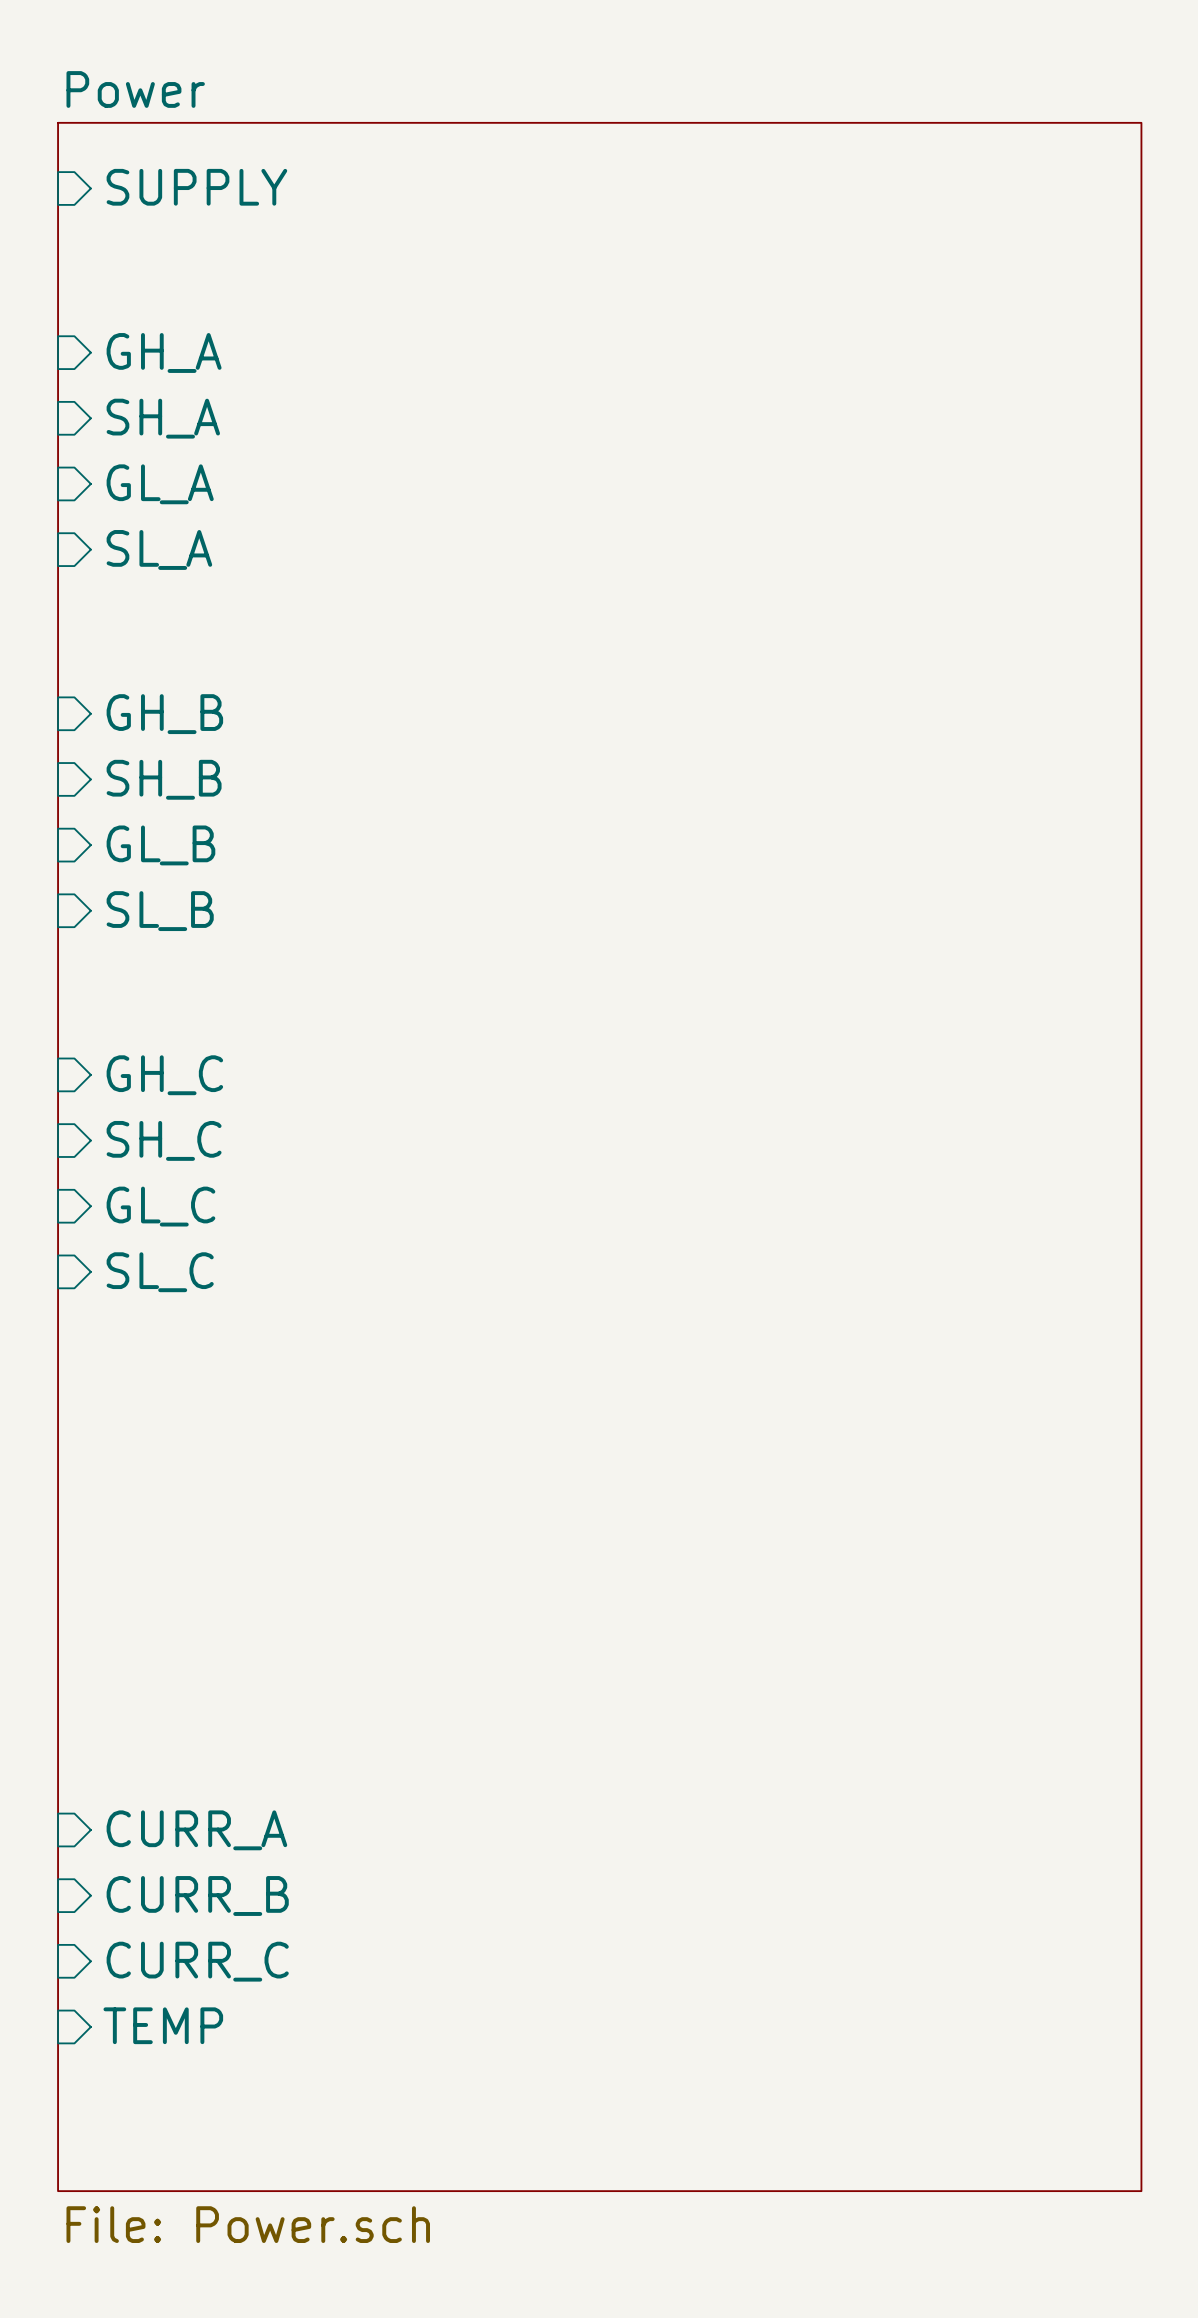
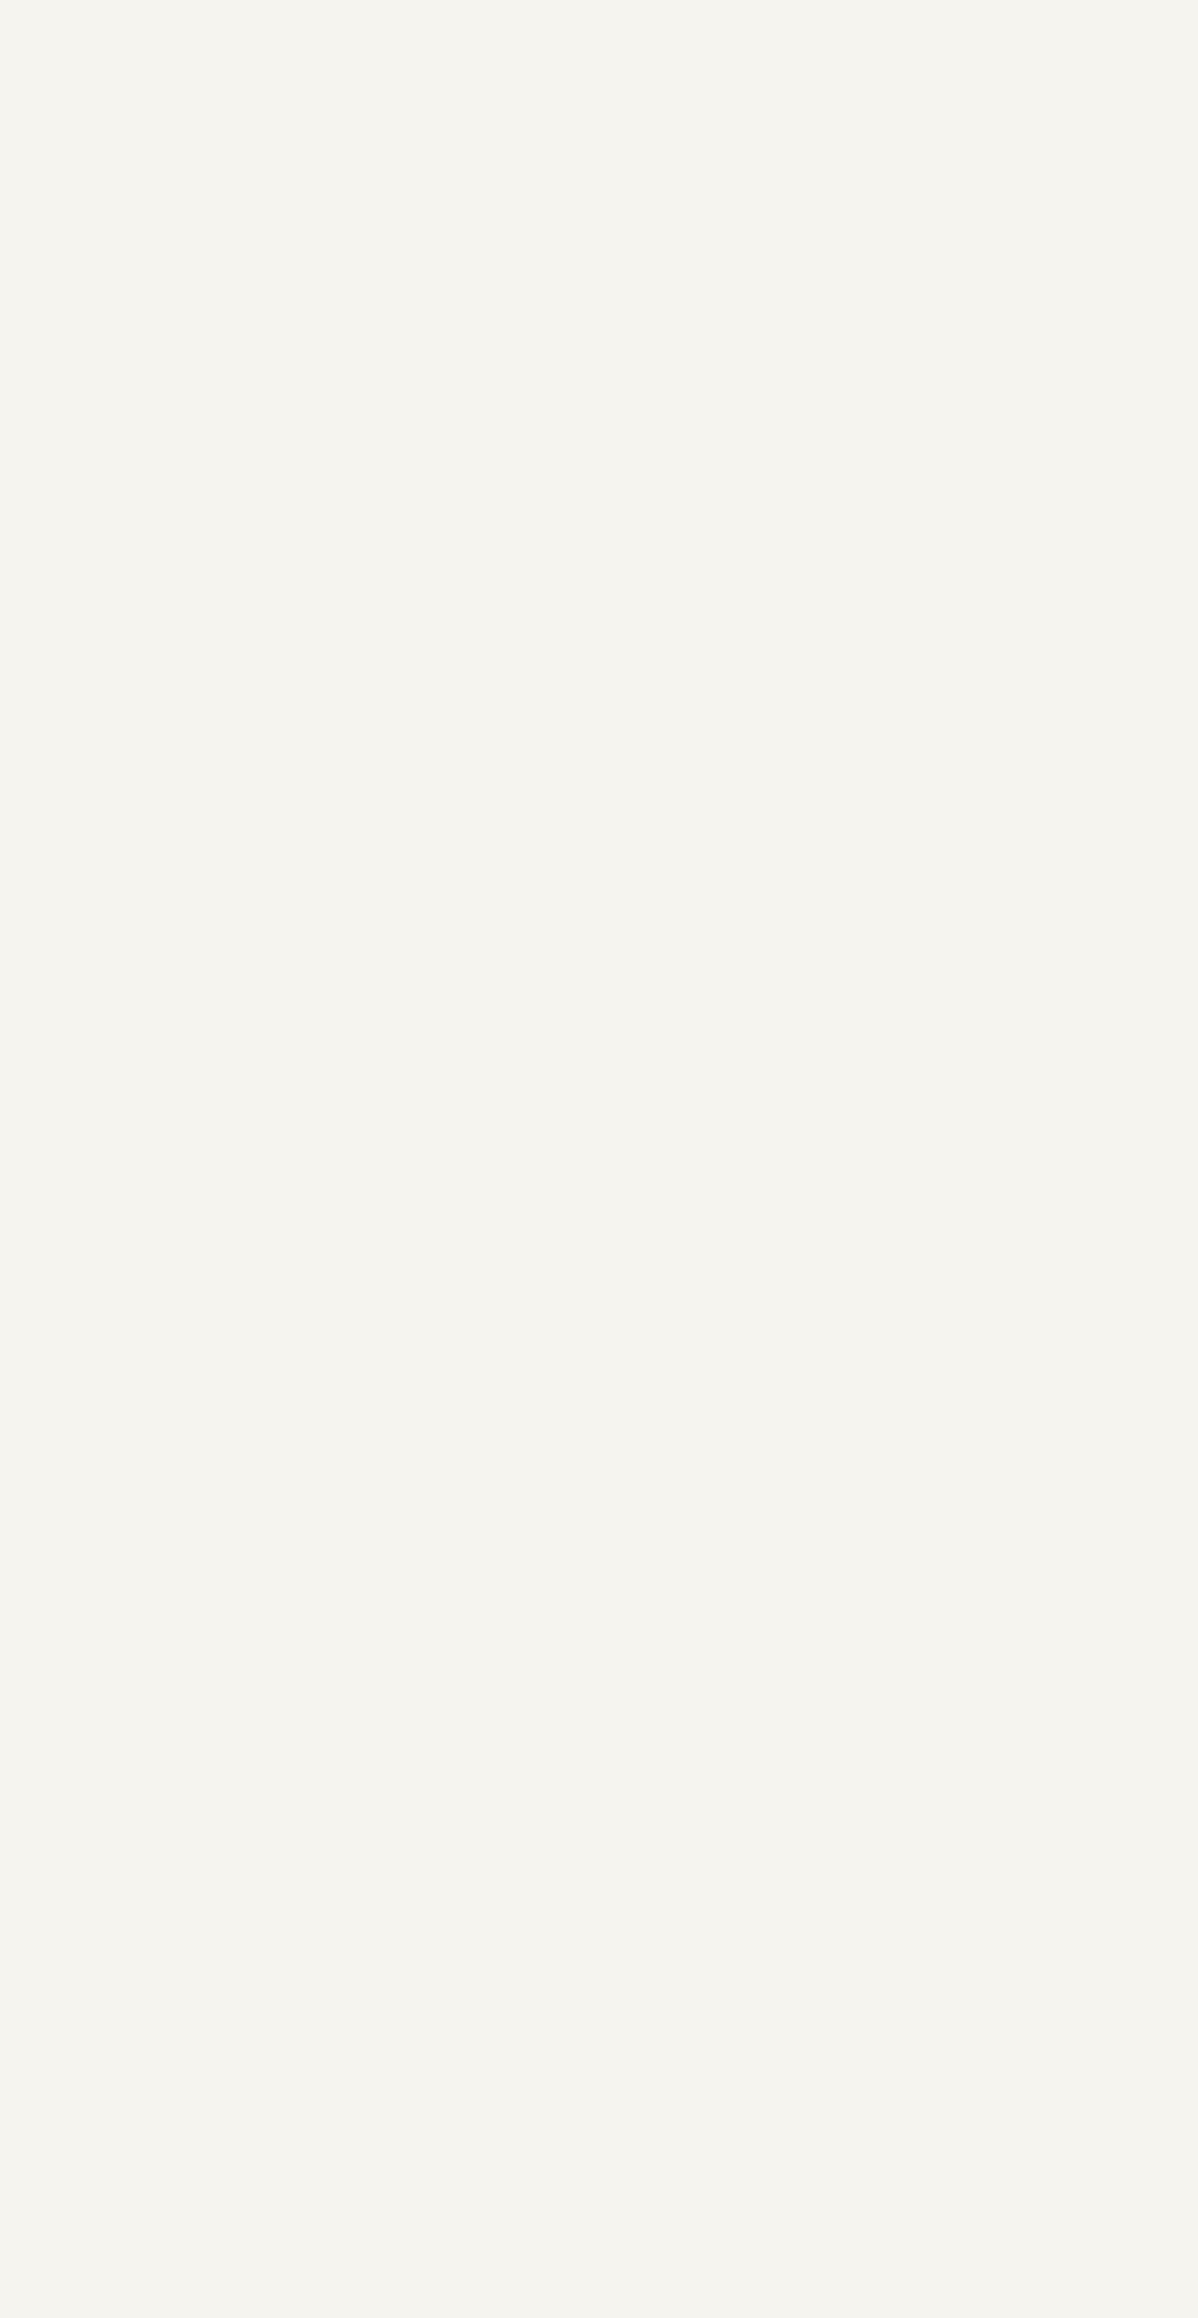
sheet pin: SUPPLY (196, 187) -> none
sheet pin: GH_A (164, 352) -> none
sheet pin: SH_A (163, 418) -> none
sheet pin: GL_A (160, 484) -> none
sheet pin: SL_A (159, 549) -> none
sheet pin: GH_B (164, 714) -> none
sheet pin: SH_B (164, 779) -> none
sheet pin: GL_B (160, 845) -> none
sheet pin: SL_B (160, 911) -> none
sheet pin: GH_C (164, 1075) -> none
sheet pin: SH_C (164, 1140) -> none
sheet Power: File: Power.sch (599, 1156) -> none
sheet pin: GL_C (160, 1206) -> none
sheet pin: SL_C (160, 1272) -> none
sheet pin: CURR_A (196, 1830) -> none
sheet pin: CURR_B (197, 1895) -> none
sheet pin: CURR_C (197, 1961) -> none
sheet pin: TEMP (163, 2025) -> none

